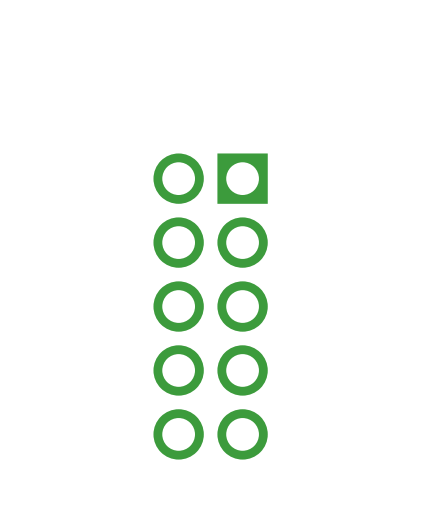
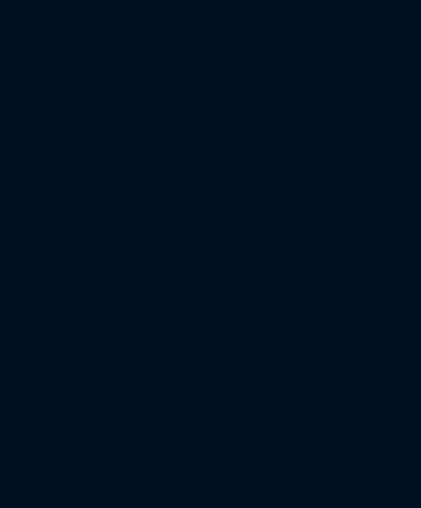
part: (210, 306) -> none

